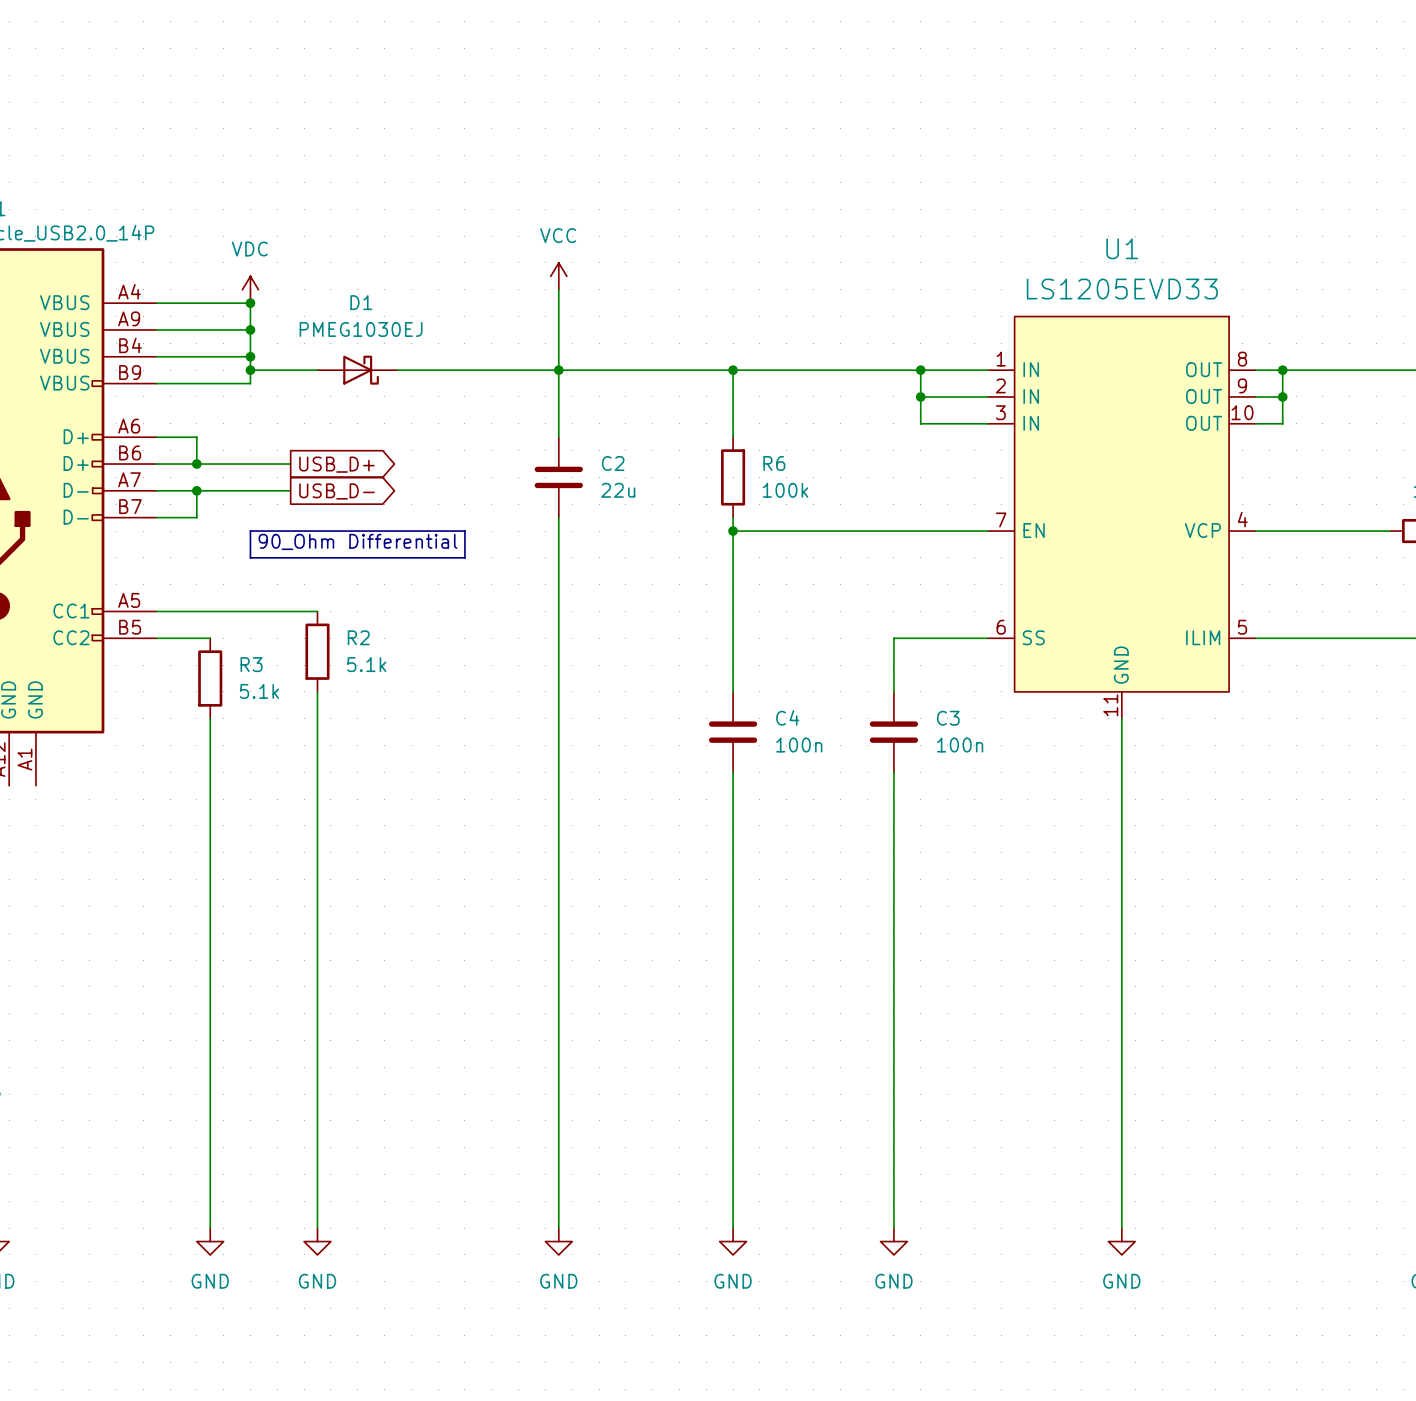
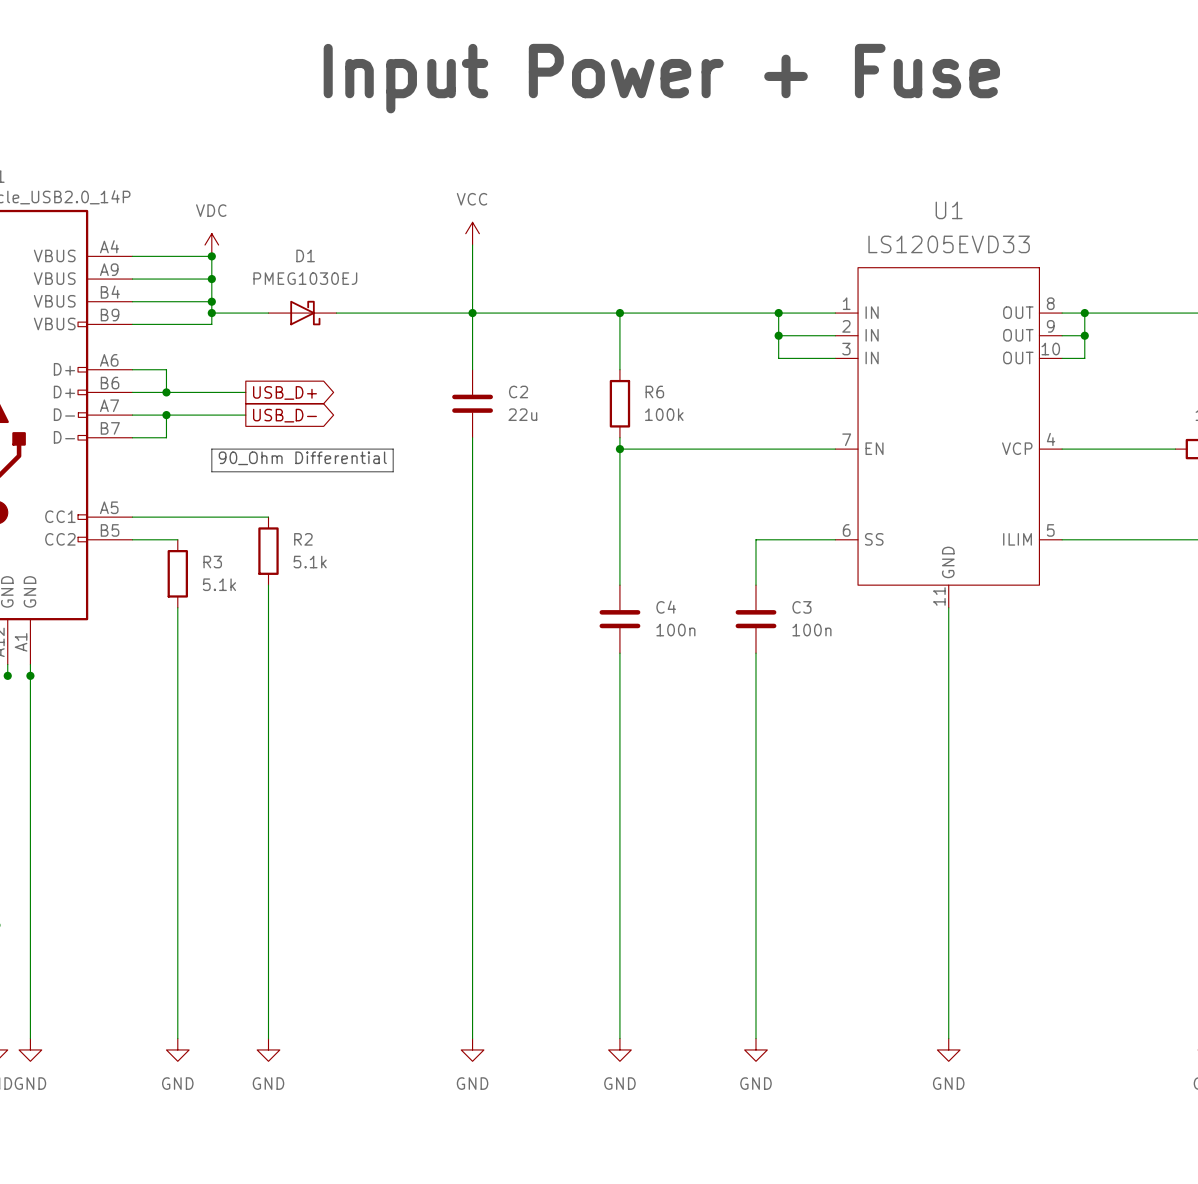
text: none -> Input Power + Fuse (661, 78)
wire: none -> (7, 664) (7, 675)
wire: none -> (30, 664) (30, 1038)
junction: none -> (7, 675)
junction: none -> (30, 675)
power symbol: none -> GND (30, 1049)

